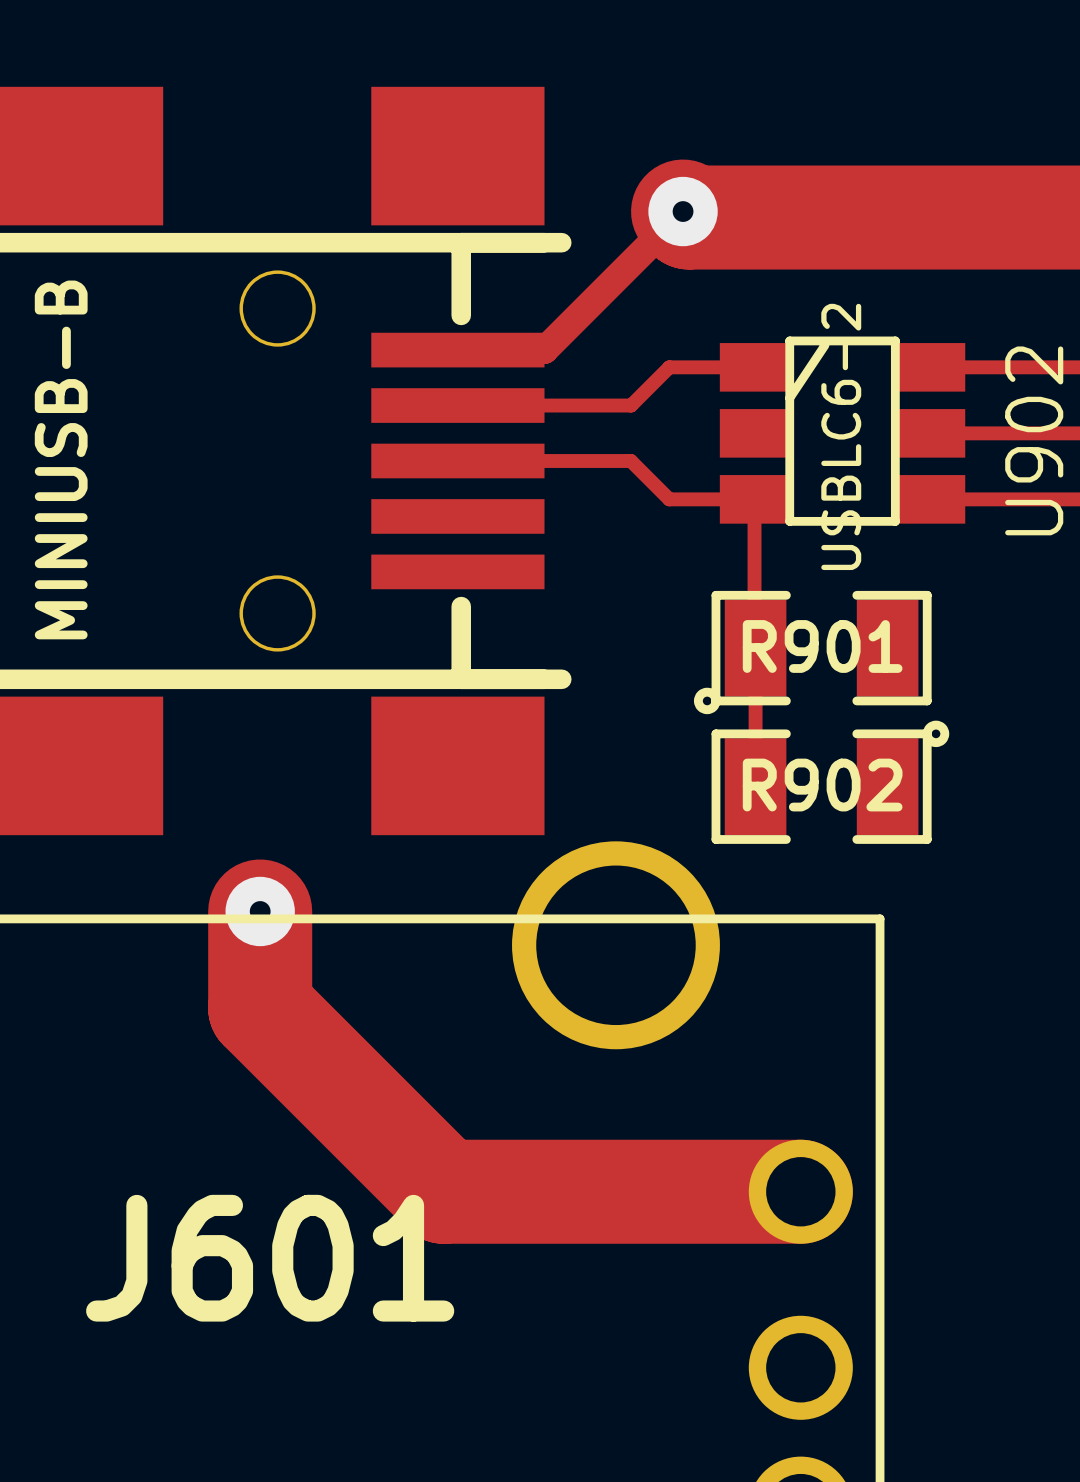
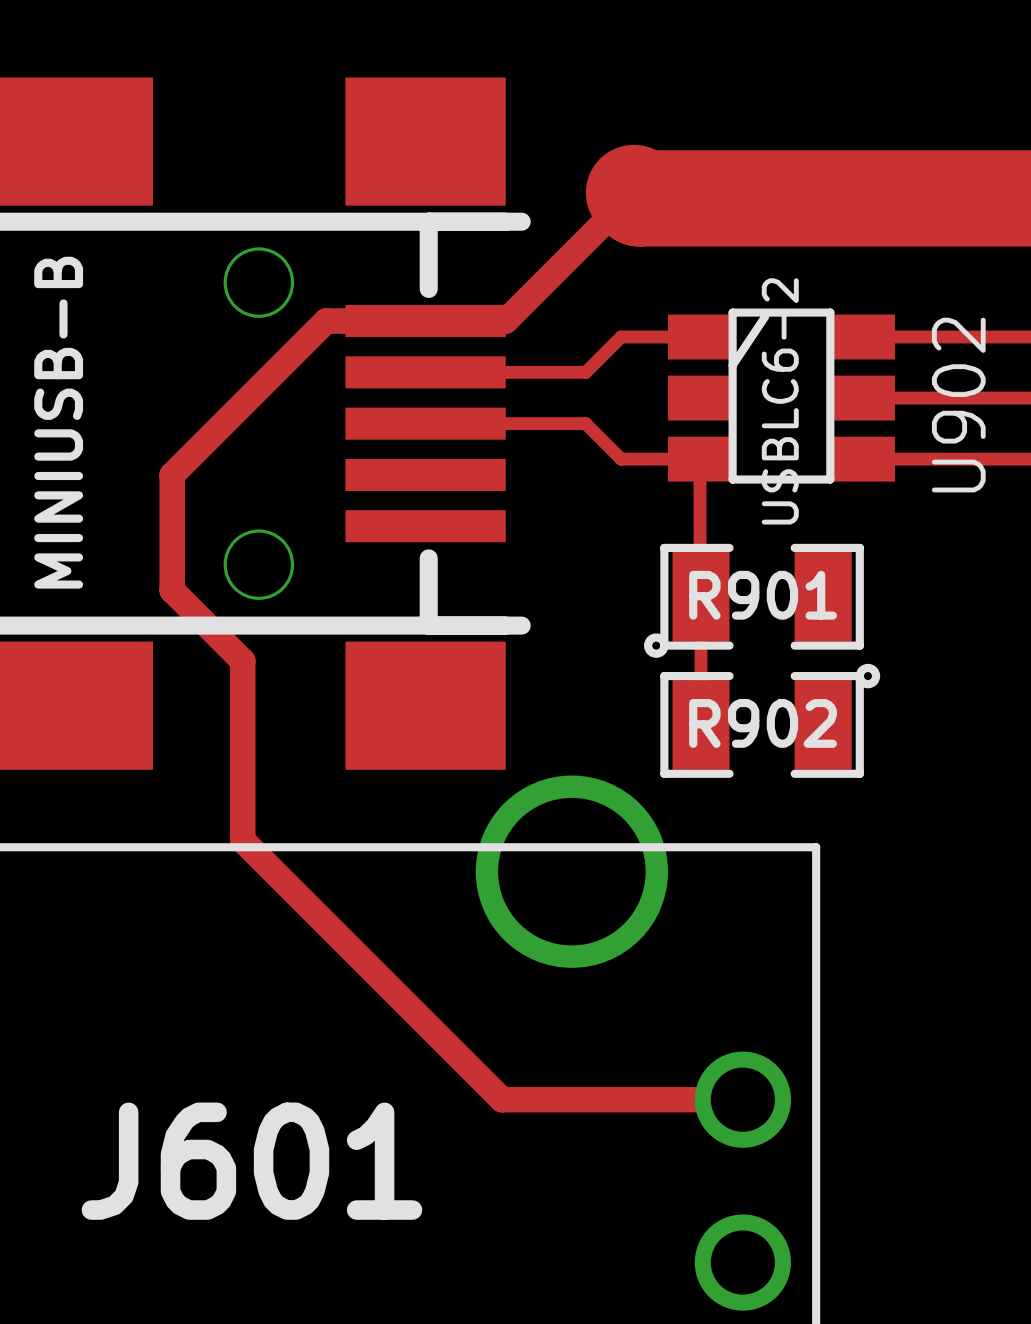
via: (683, 211) -> none
track: (260, 911) (260, 1008) (443, 1191) (540, 1191) -> (425, 321) (326, 321) (172, 474) (172, 590) (242, 660) (242, 840) (502, 1099)
via: (260, 911) -> none
track width: thick (540, 1191) (800, 1191) -> thin (502, 1099) (742, 1099)

